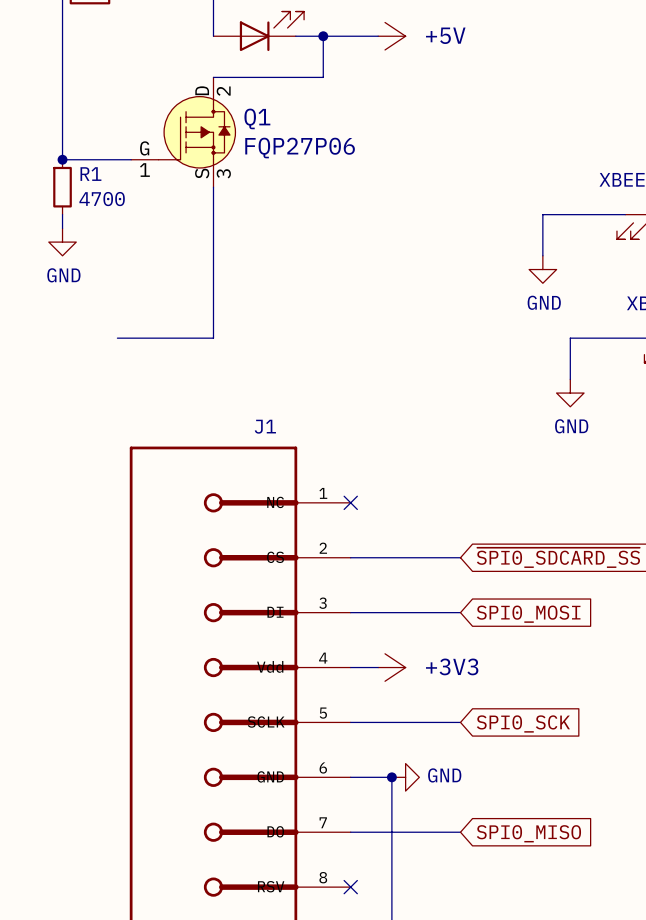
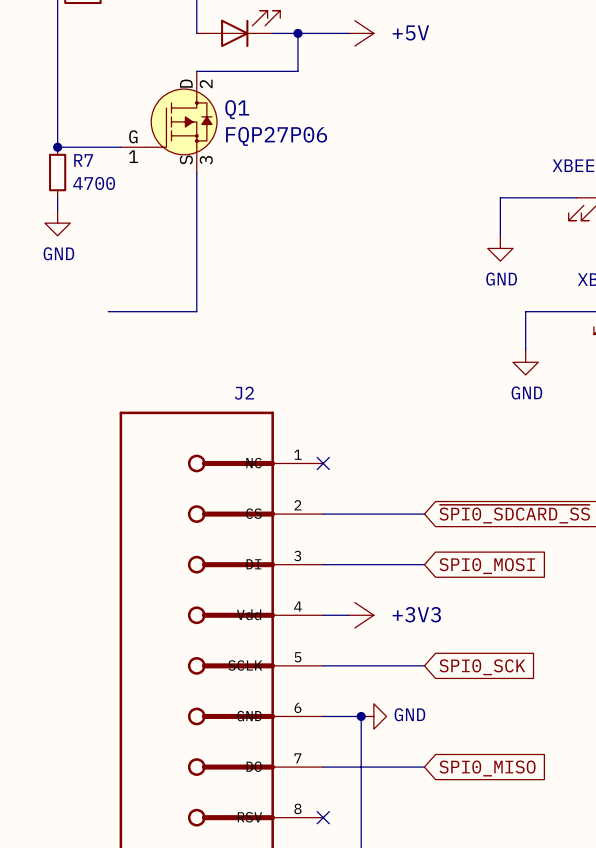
R1 name: R1 (90, 174) -> R7 (83, 160)
J1 name: J1 (265, 426) -> J2 (244, 393)

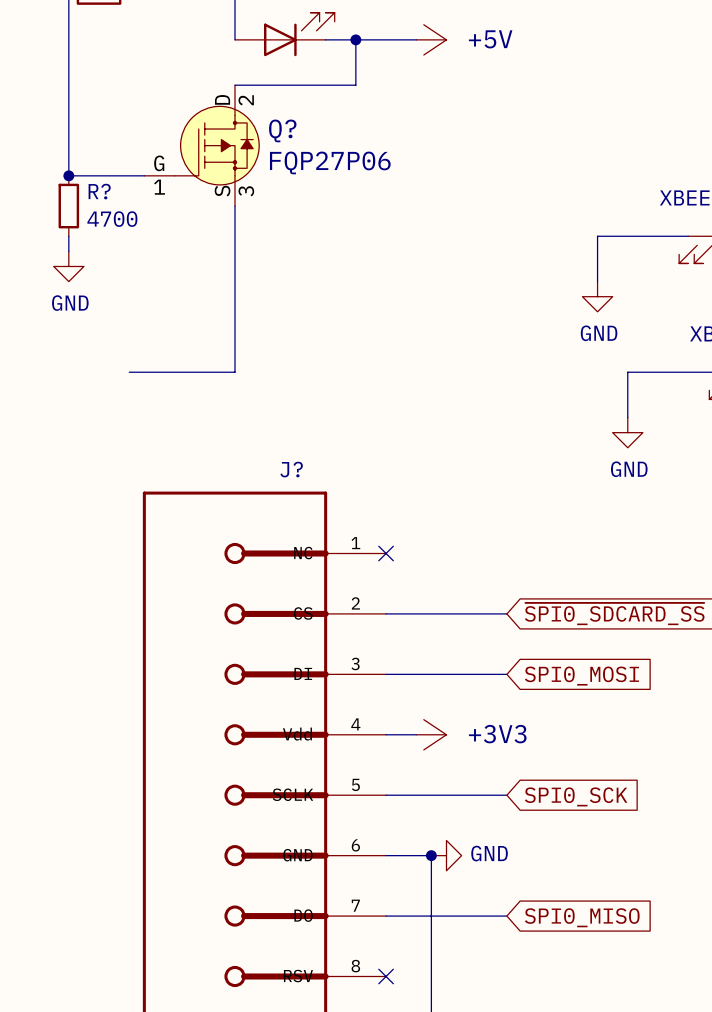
Q1 name: Q1 (237, 109) -> Q? (282, 130)
R7 name: R7 (83, 160) -> R? (99, 191)
J2 name: J2 (244, 393) -> J? (291, 469)

